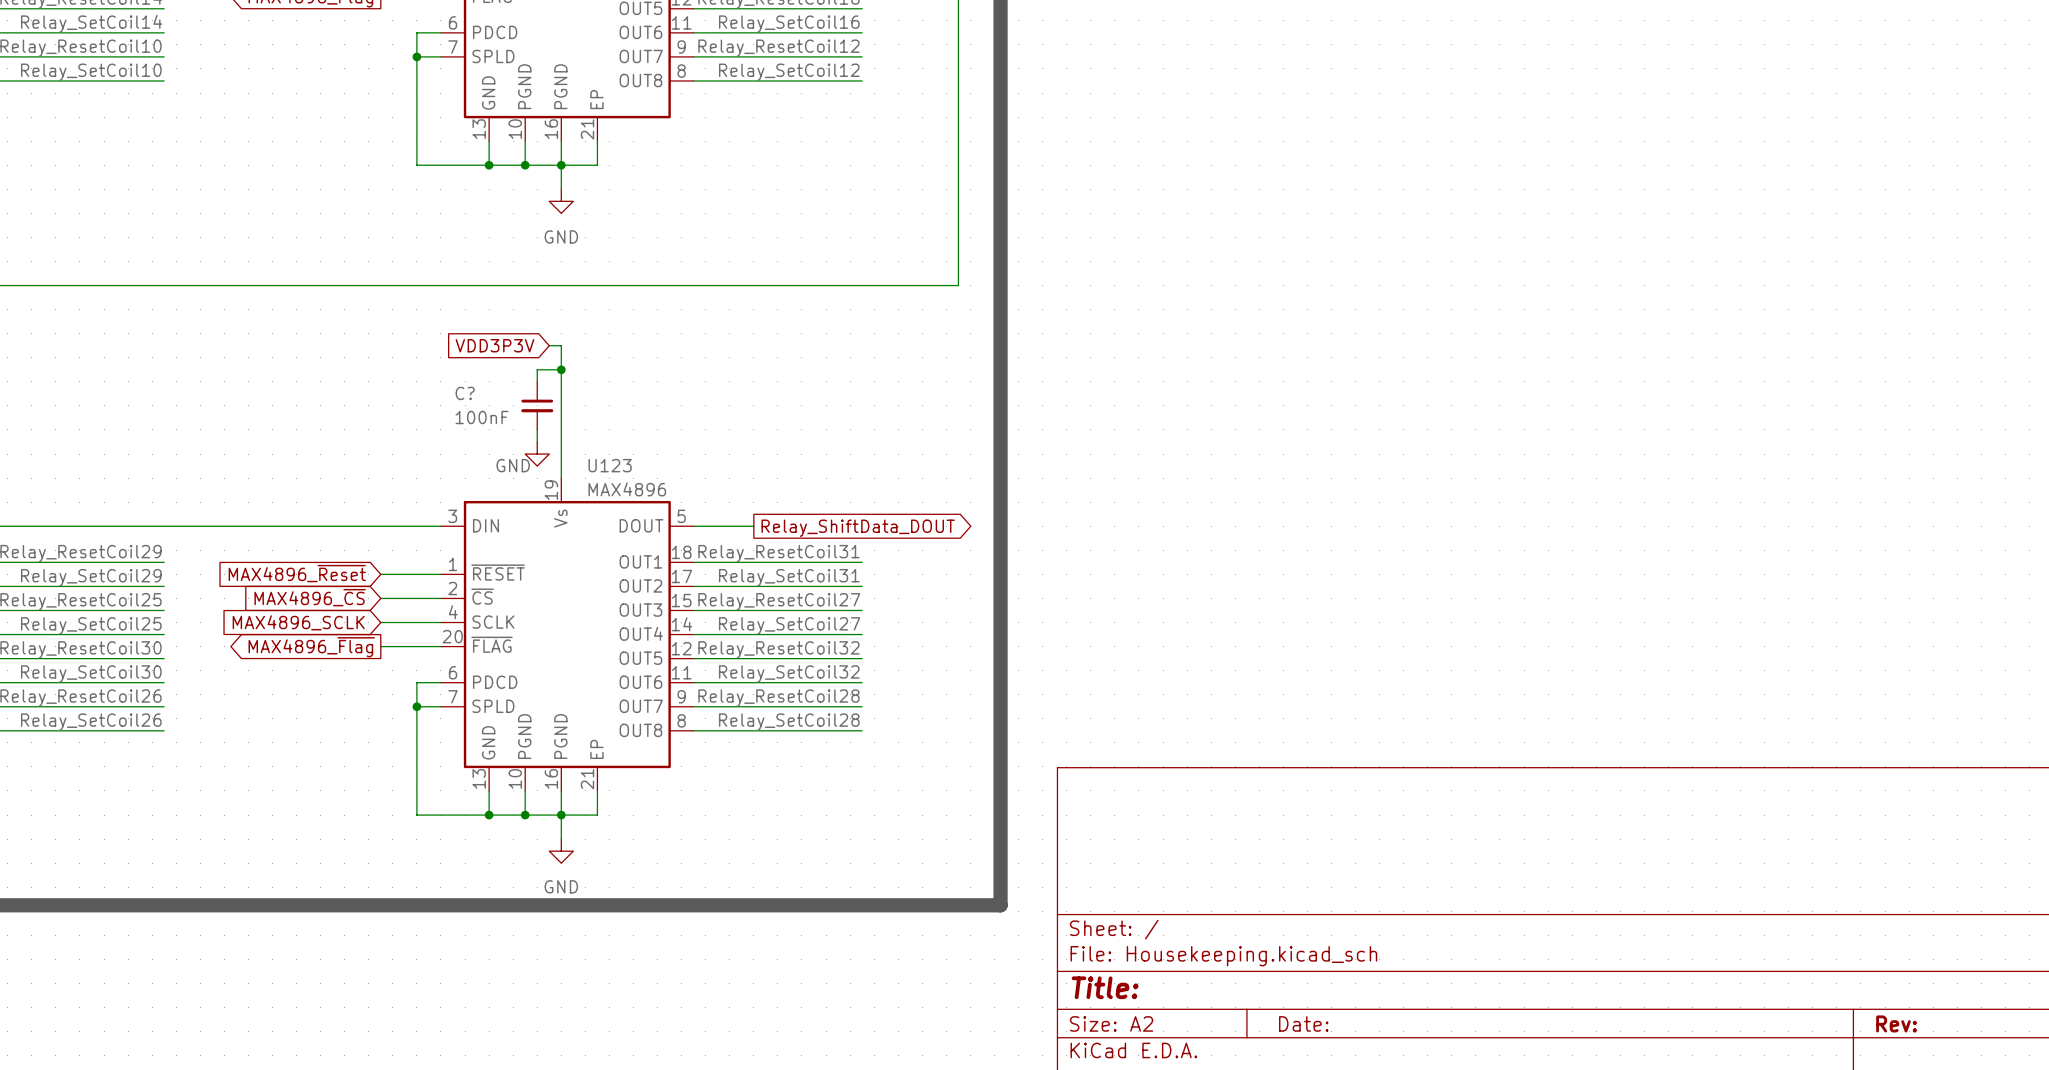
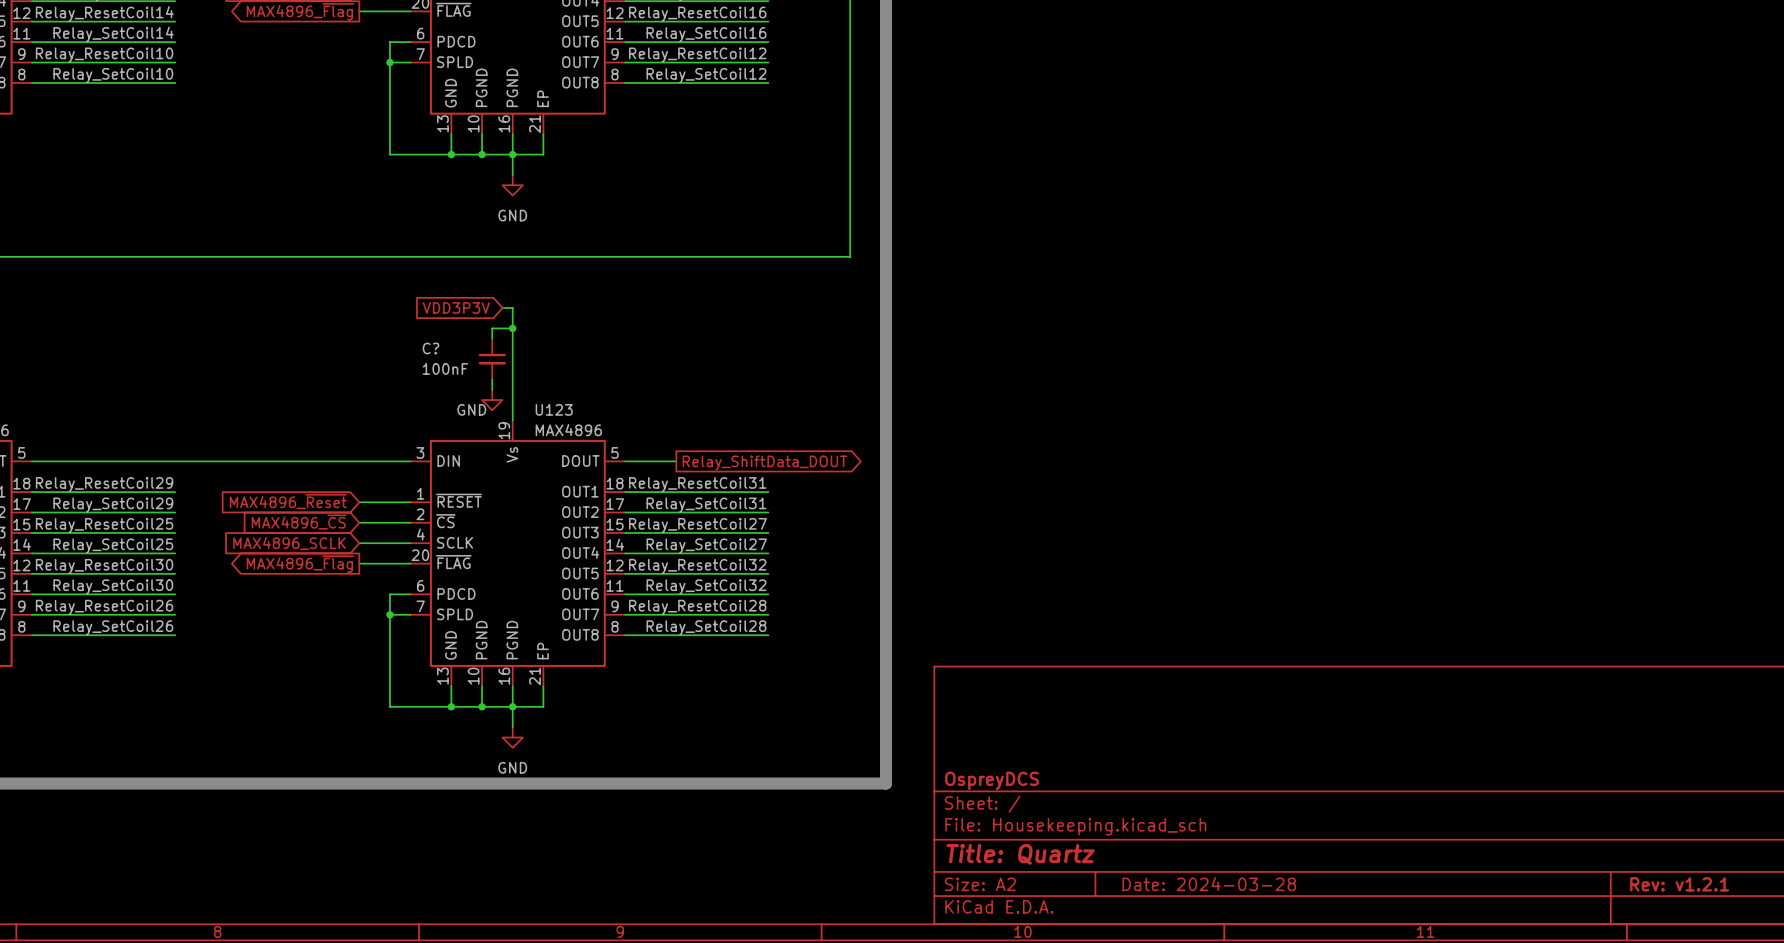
title block: none -> OspreyDCS (992, 780)
title block: Title: (1105, 987) -> Title: Quartz (1020, 854)
title block: Date: (1303, 1023) -> Date: 2024-03-28 (1209, 884)
title block: Rev: (1896, 1023) -> Rev: v1.2.1 (1679, 884)

